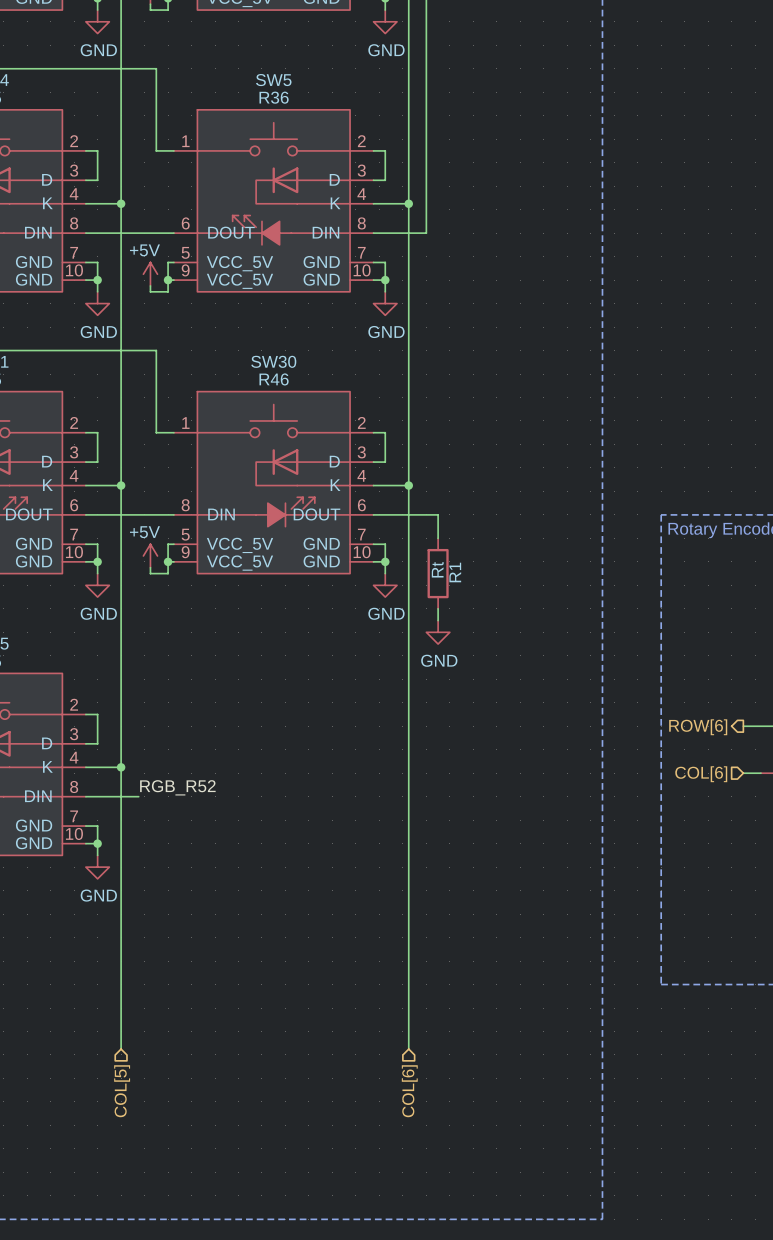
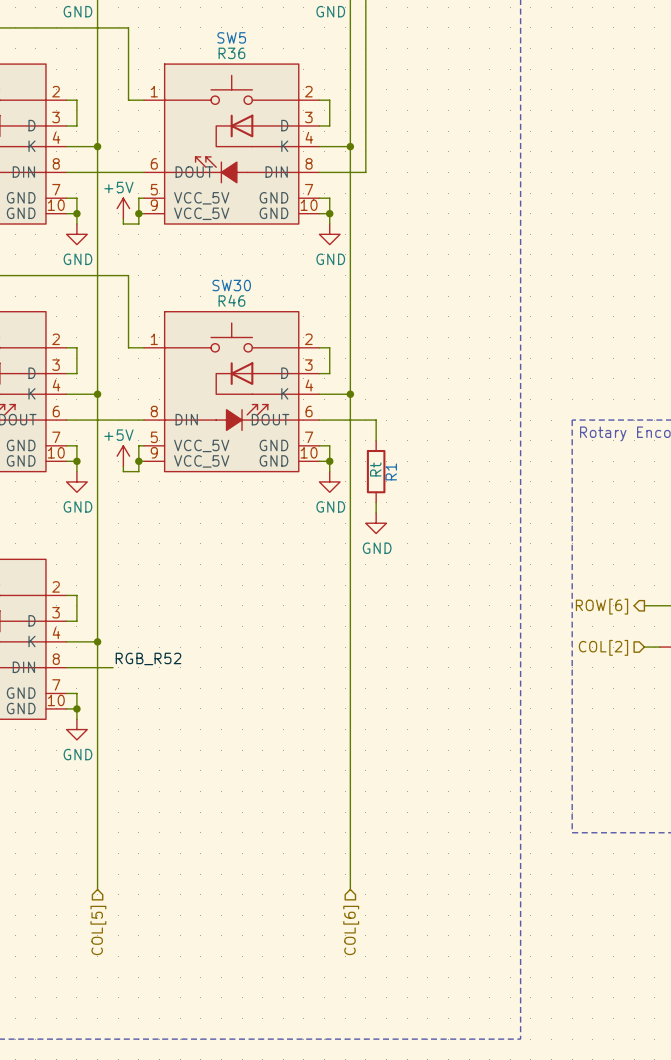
hierarchical label: COL[6] (701, 774) -> COL[2] (603, 647)

